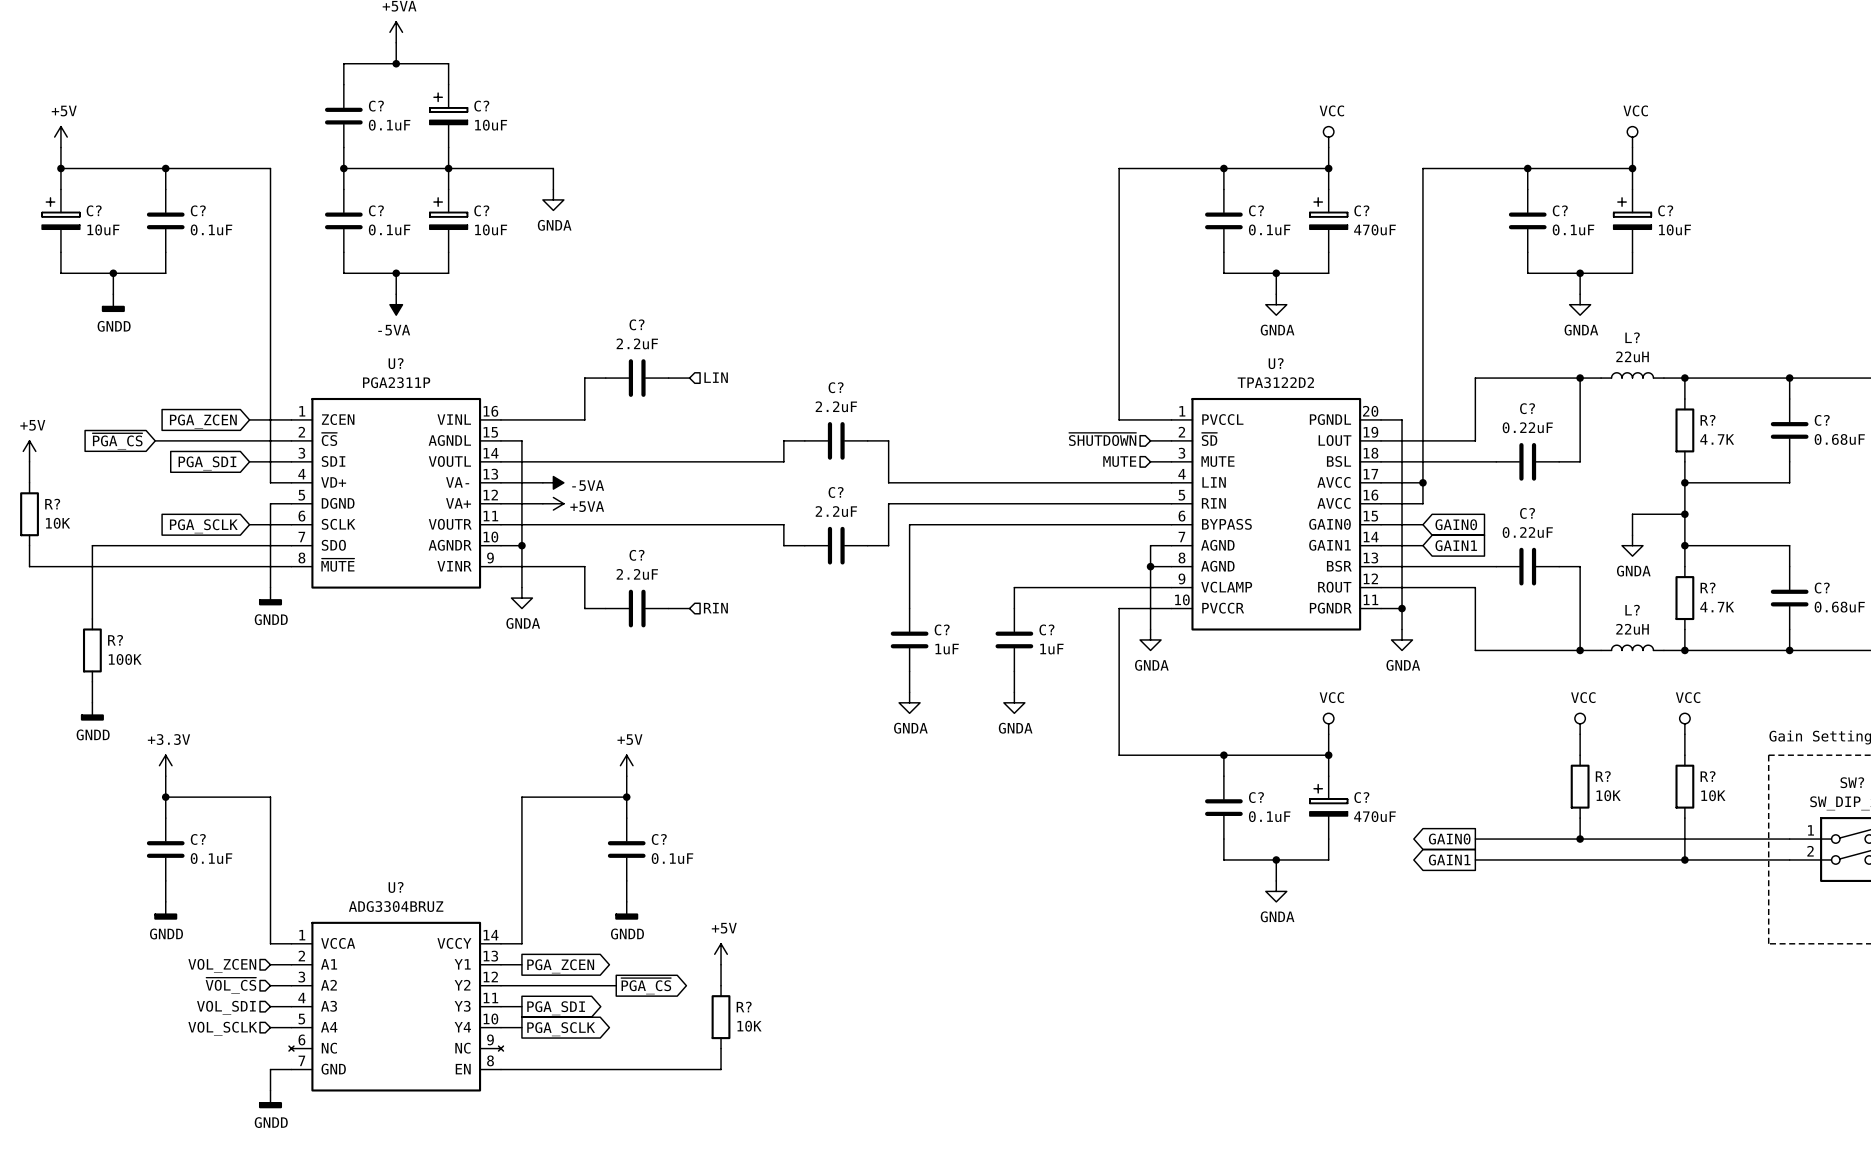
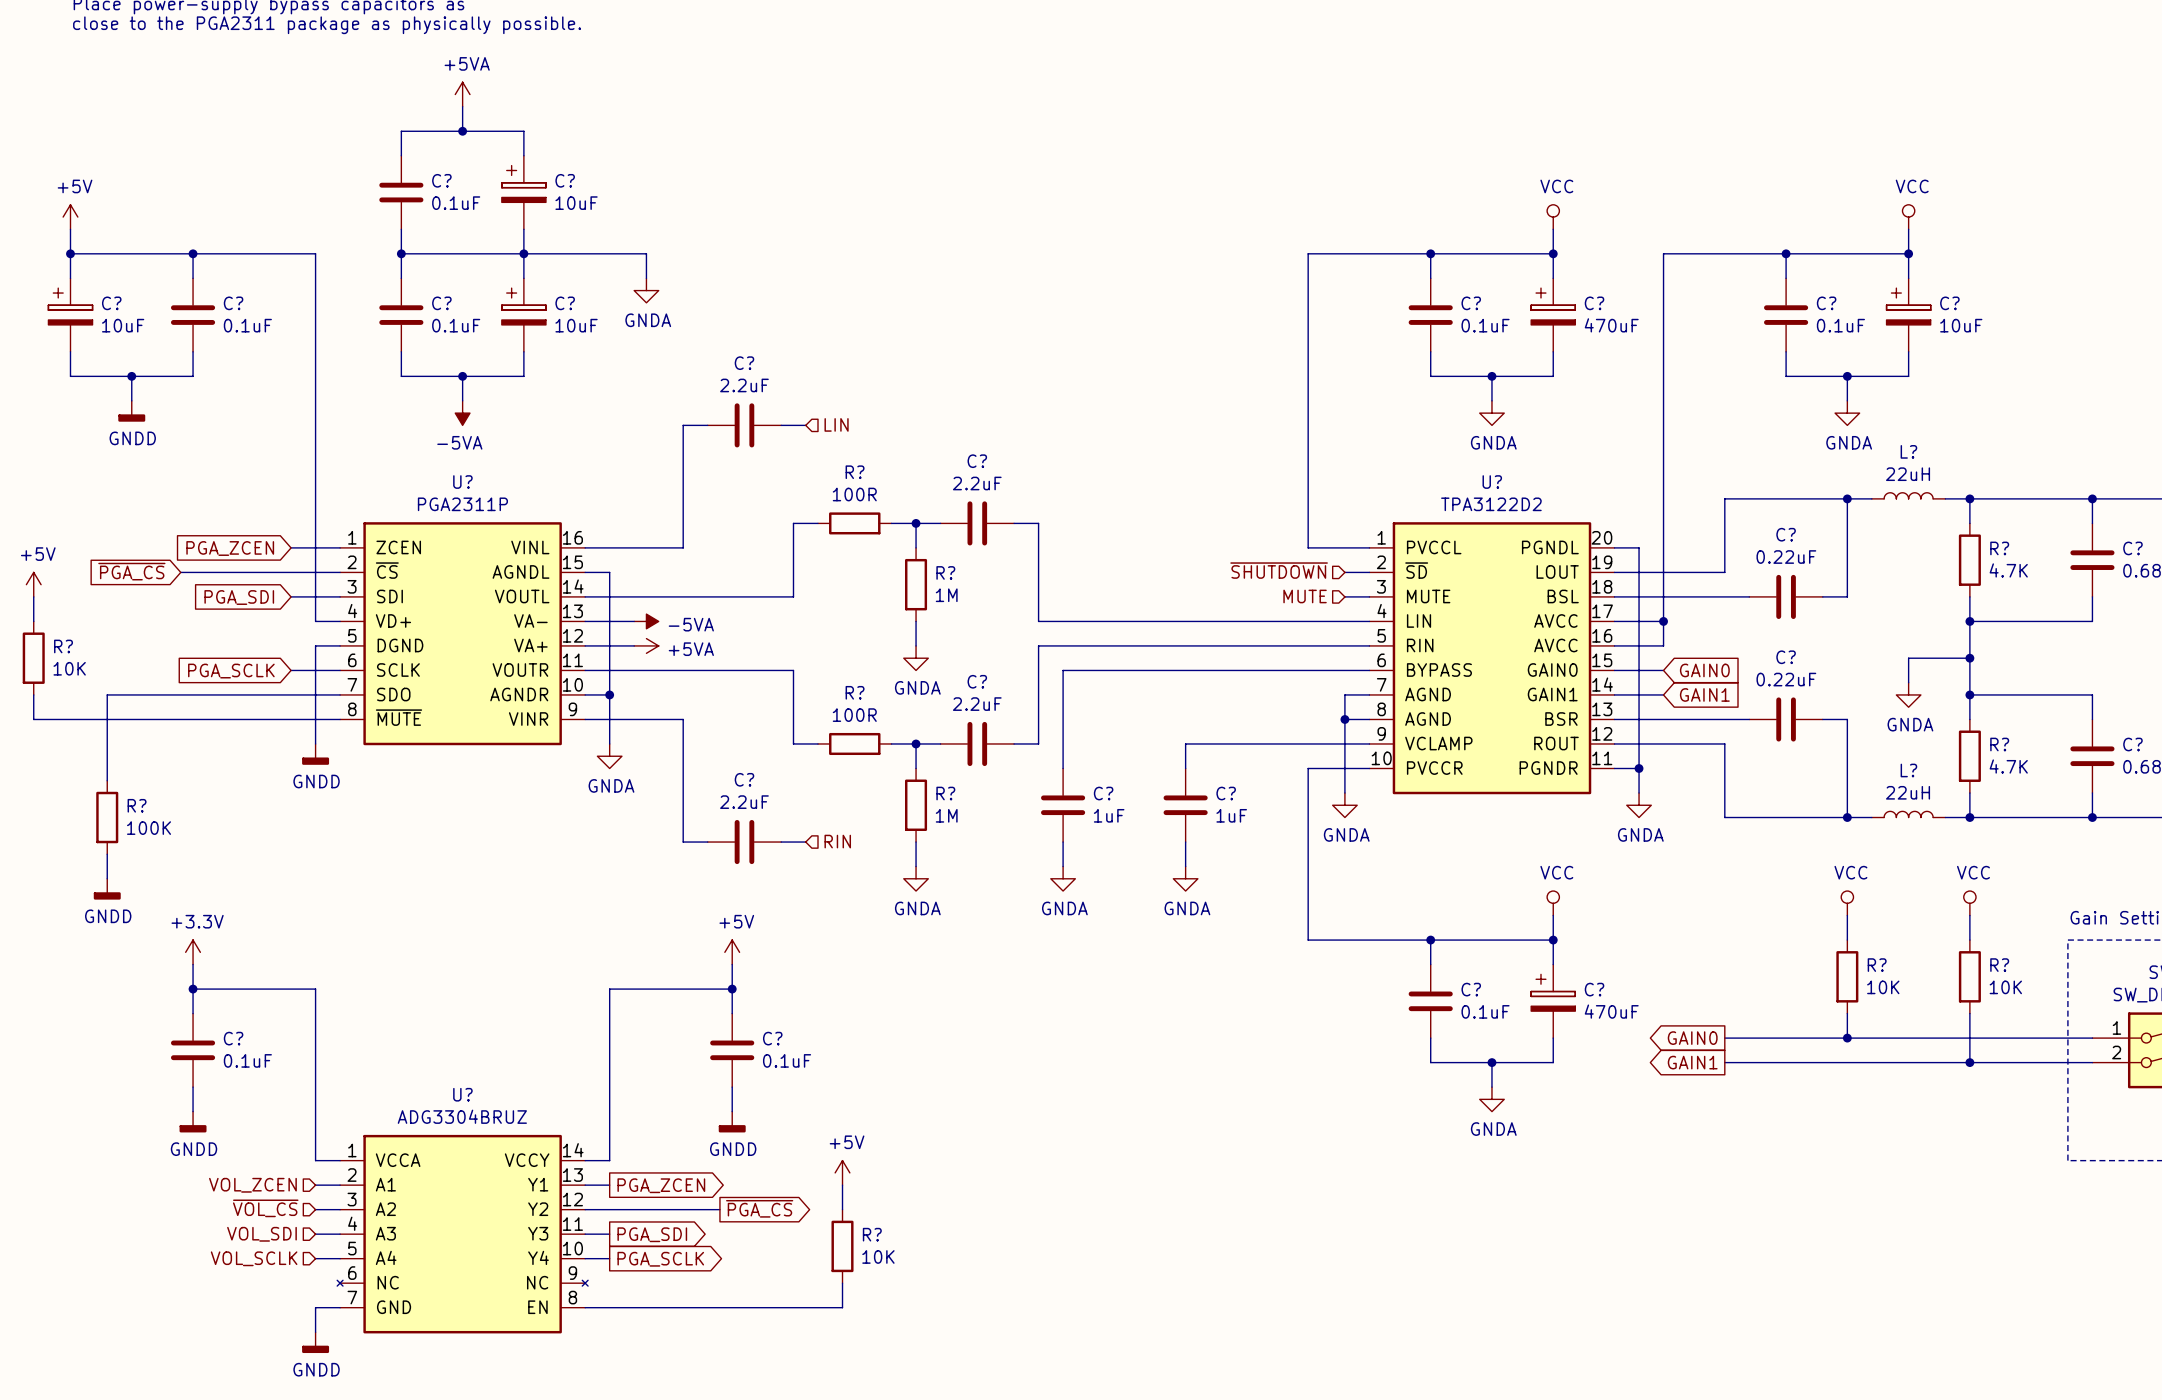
hierarchical label position: LIN (716, 377) -> LIN (836, 424)
wire: (584, 378) (605, 378) -> (683, 498) (683, 425) (707, 425)
C? position: (637, 378) -> (744, 425)
wire: (668, 378) (689, 378) -> (781, 425) (805, 425)
R?: none -> 100R (854, 523)
wire: none -> (891, 523) (940, 523)
wire: none -> (916, 523) (916, 547)
junction: none -> (916, 523)
wire: (804, 440) (783, 440) (783, 461) (679, 461) -> (818, 523) (793, 523) (793, 596)
C? position: (836, 440) -> (977, 523)
wire: (867, 440) (888, 440) -> (1014, 523) (1038, 523) (1038, 572)
R?: none -> 1M (916, 584)
wire: none -> (916, 621) (916, 645)
power symbol: none -> GNDA (916, 658)
wire: (679, 524) (783, 524) (783, 545) (804, 545) -> (793, 670) (793, 743) (818, 743)
C? position: (836, 545) -> (977, 743)
wire: (867, 545) (888, 545) -> (1014, 743) (1038, 743) (1038, 694)
R?: none -> 100R (854, 743)
wire: none -> (891, 743) (940, 743)
wire: none -> (916, 743) (916, 768)
junction: none -> (916, 743)
wire: (584, 608) (605, 608) -> (683, 768) (683, 842) (707, 842)
C? position: (637, 608) -> (744, 842)
wire: (668, 608) (689, 608) -> (781, 842) (805, 842)
hierarchical label position: RIN (715, 608) -> RIN (837, 841)
R?: none -> 1M (916, 805)
wire: none -> (916, 842) (916, 866)
power symbol: none -> GNDA (916, 878)

